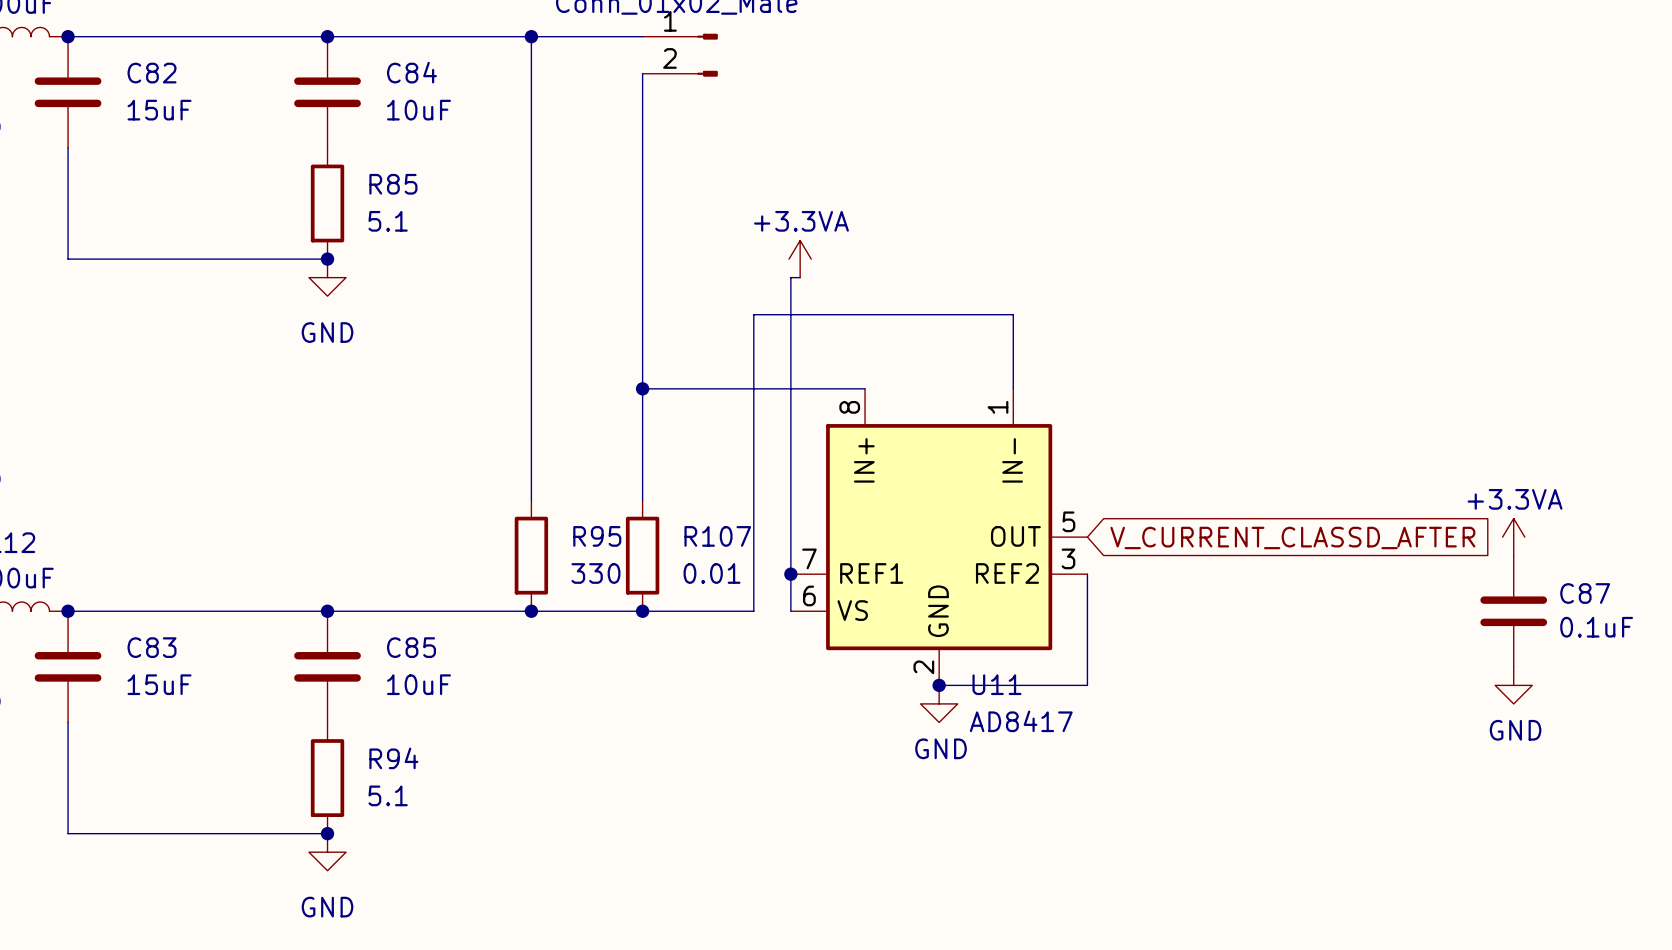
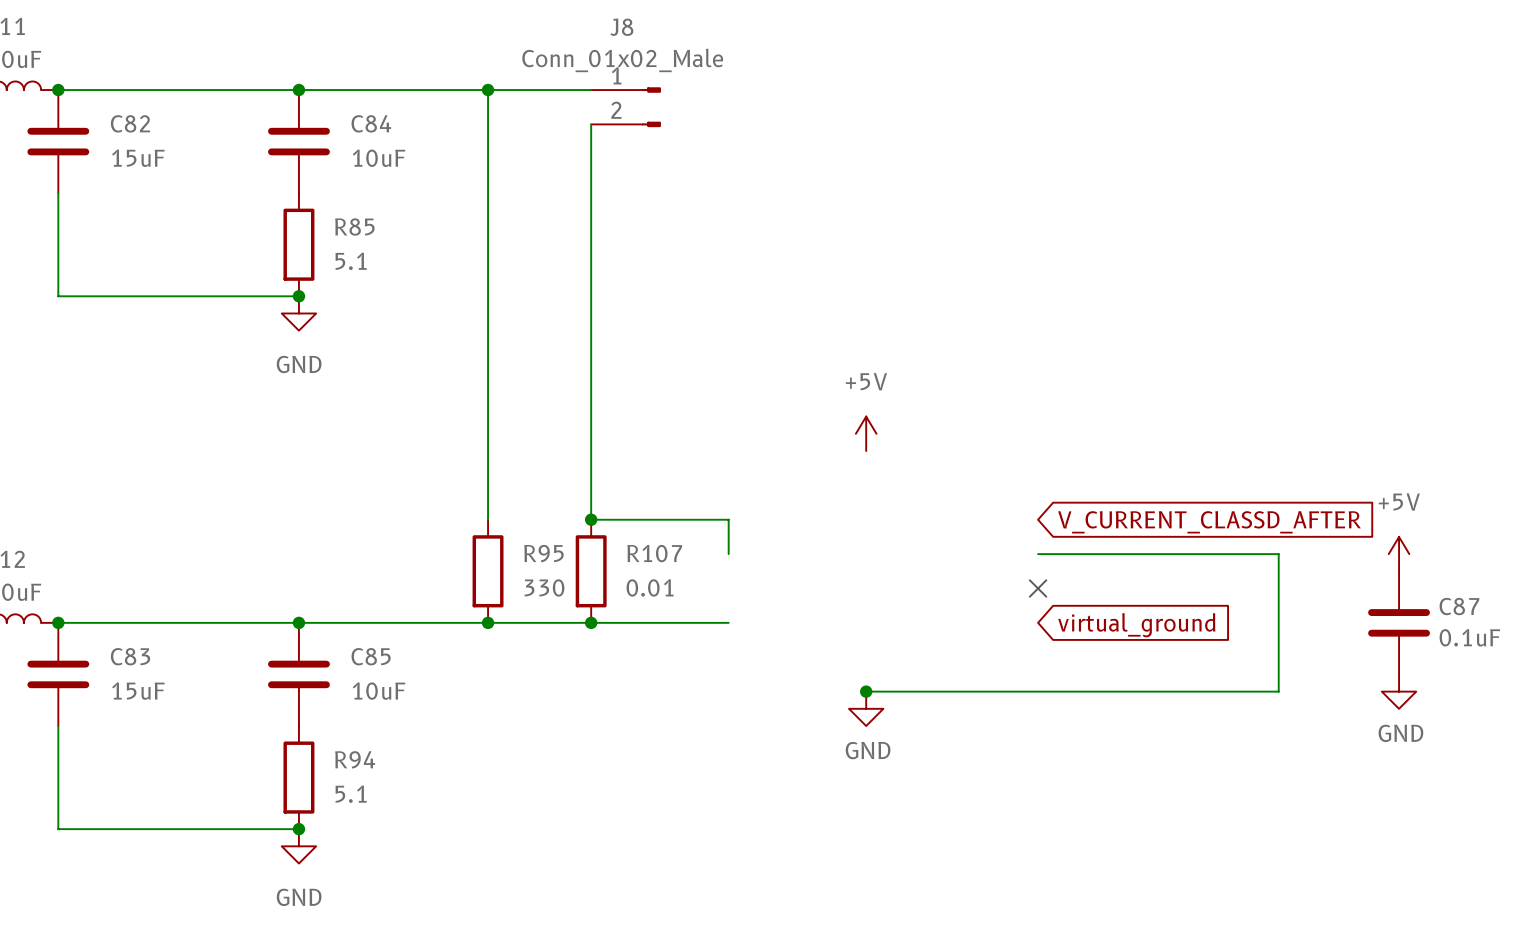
power symbol: +3.3VA (800, 259) -> none
wire: (800, 277) (790, 277) (790, 500) -> (591, 519) (728, 519)
wire: (642, 388) (865, 388) -> none
junction: (642, 388) -> none
wire: (1013, 388) (1013, 314) (753, 314) (753, 611) -> none
power symbol: none -> +5V (866, 433)
junction: none -> (591, 519)
wire: (790, 537) (790, 611) -> (694, 622) (728, 622)
U11: AD8417 (939, 537) -> none
global label position: V_CURRENT_CLASSD_AFTER (1292, 537) -> V_CURRENT_CLASSD_AFTER (1209, 522)
power symbol: +3.3VA (1513, 537) -> +5V (1399, 554)
junction: (790, 574) -> none
wire: (1087, 574) (1087, 685) -> (1038, 554) (1278, 554) (1278, 691) (1003, 691)
no-connect mark: none -> (1038, 588)
global label: none -> virtual_ground (1136, 625)

